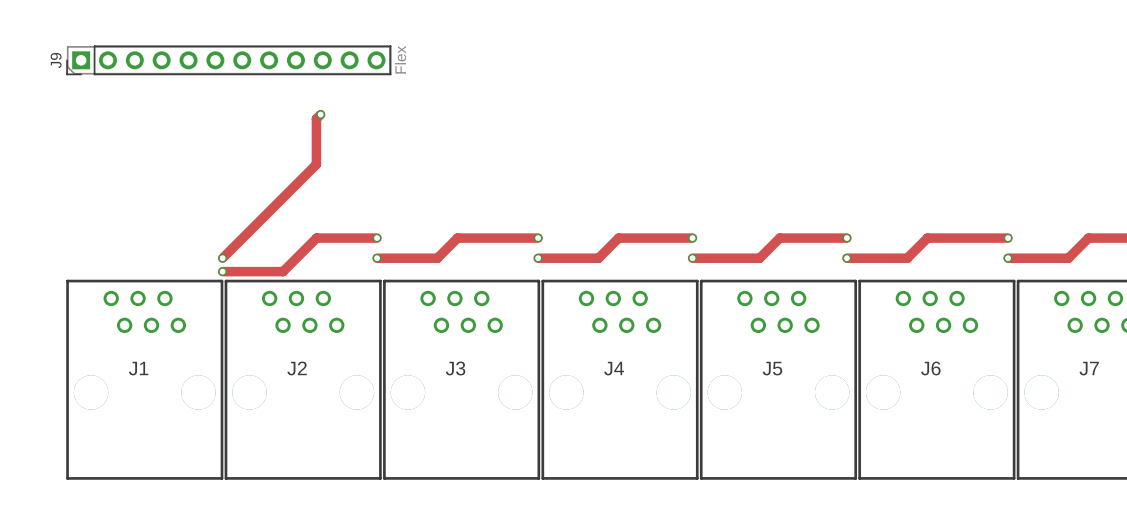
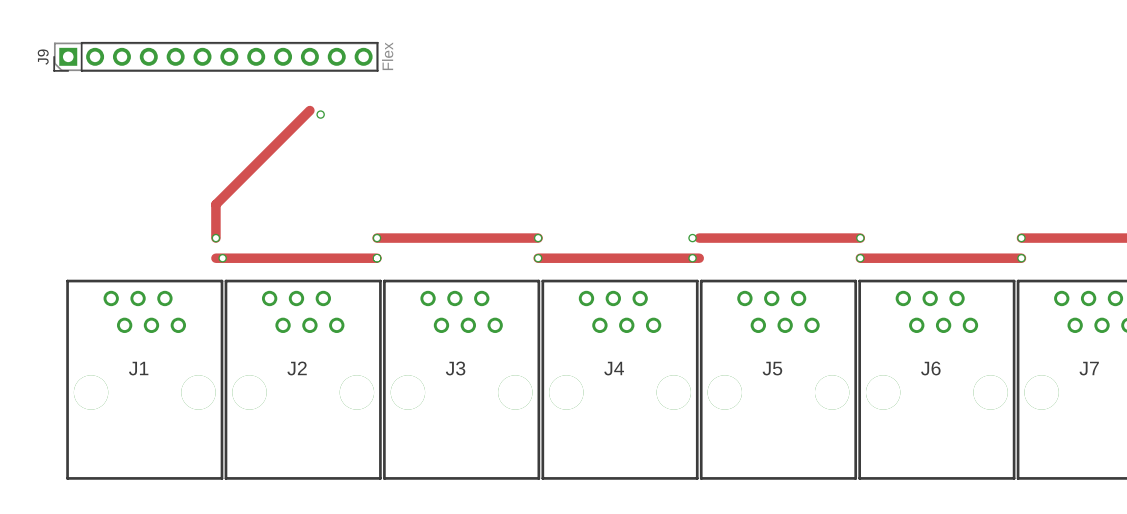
J9 position: (228, 60) -> (215, 56)
track: none -> (309, 110) (215, 204) (215, 238)
track: (320, 114) (316, 118) (316, 164) (222, 258) -> none
track: (377, 238) (316, 238) (283, 271) (222, 271) -> none
track: (457, 238) (437, 258) (377, 258) -> (457, 238) (377, 238)
track: (692, 238) (618, 238) (598, 258) -> (692, 258) (598, 258)
track: (779, 238) (759, 258) (699, 258) -> (779, 238) (699, 238)
via: (846, 238) -> none
via: none -> (860, 238)
track: (1008, 238) (927, 238) (907, 258) -> (1008, 258) (907, 258)
via: (1008, 238) -> none
via: none -> (1021, 238)
track: (1088, 238) (1068, 258) (1021, 258) -> (1088, 238) (1021, 238)
track: none -> (215, 258) (377, 258)
track: (846, 258) (860, 258) -> (846, 238) (860, 238)
via: (846, 258) -> none
via: none -> (860, 258)
via: (1008, 258) -> none
via: none -> (1021, 258)
via position: (222, 271) -> (215, 238)

